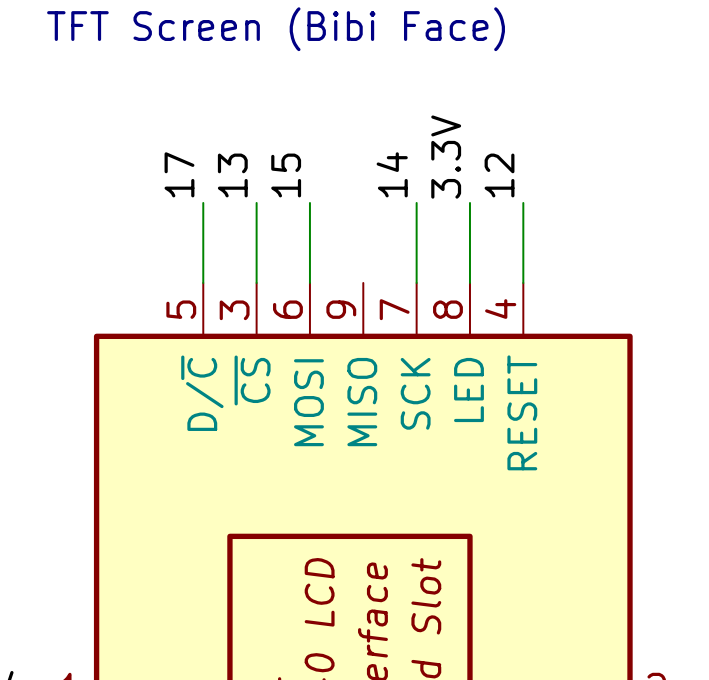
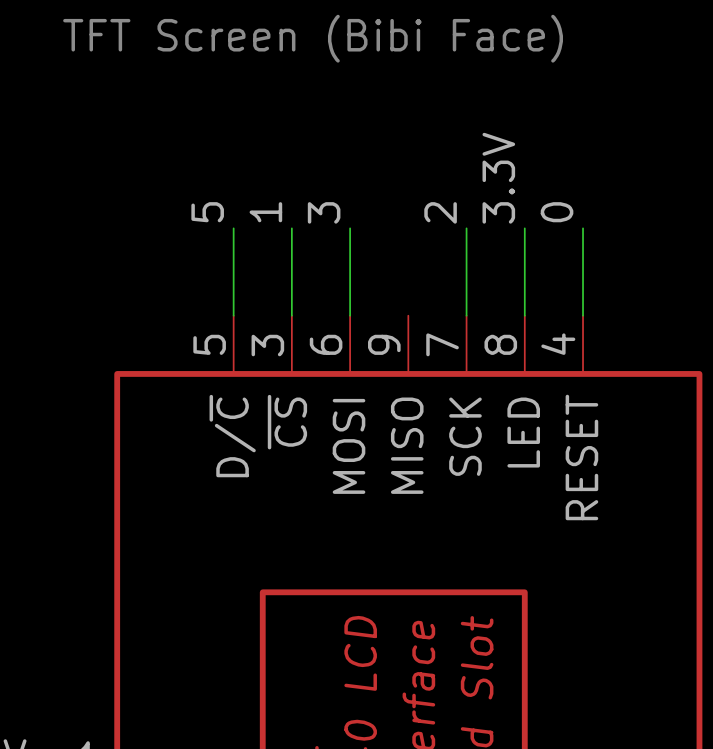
label: 17 (179, 174) -> 5 (207, 212)
label: 14 (392, 174) -> 2 (440, 212)
label: 13 (232, 175) -> 1 (265, 212)
label: 15 (286, 175) -> 3 (324, 212)
label: 12 (499, 175) -> 0 (557, 212)

